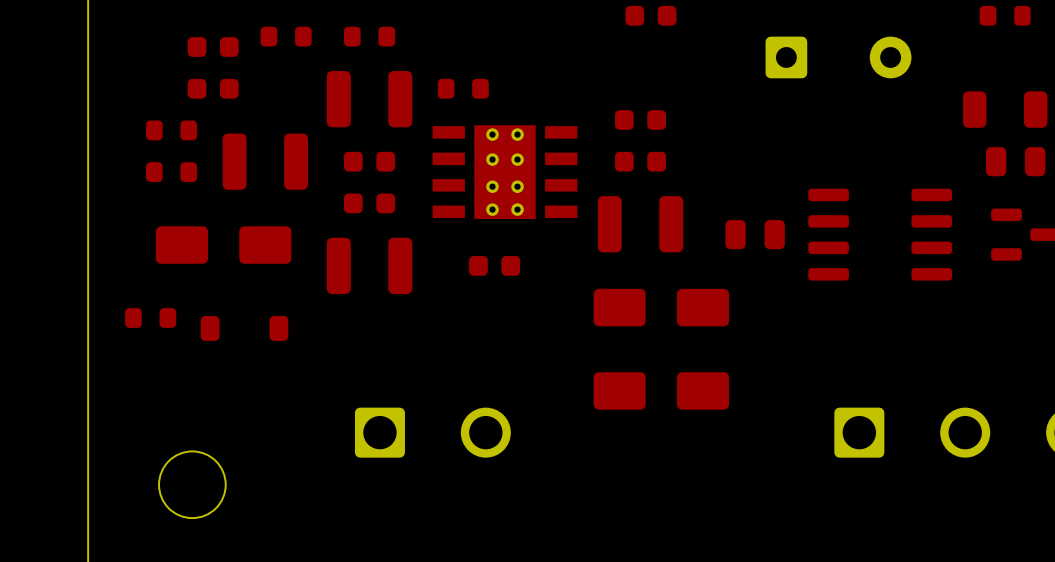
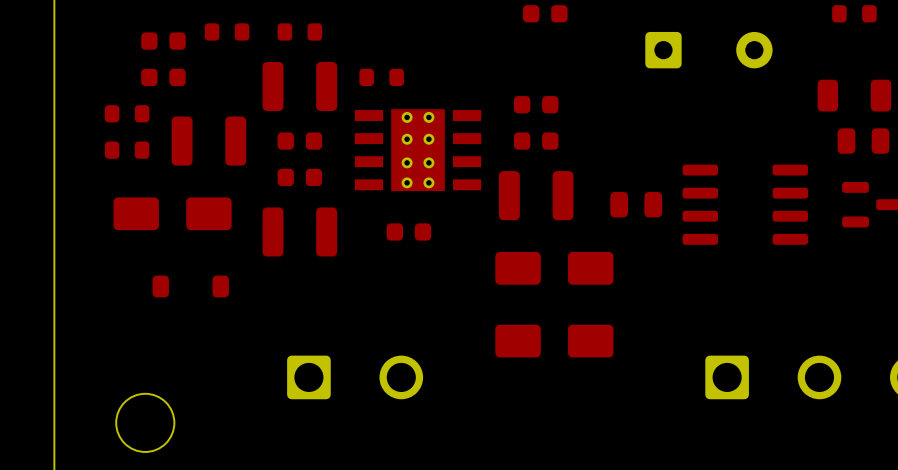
part: (150, 318) -> none

